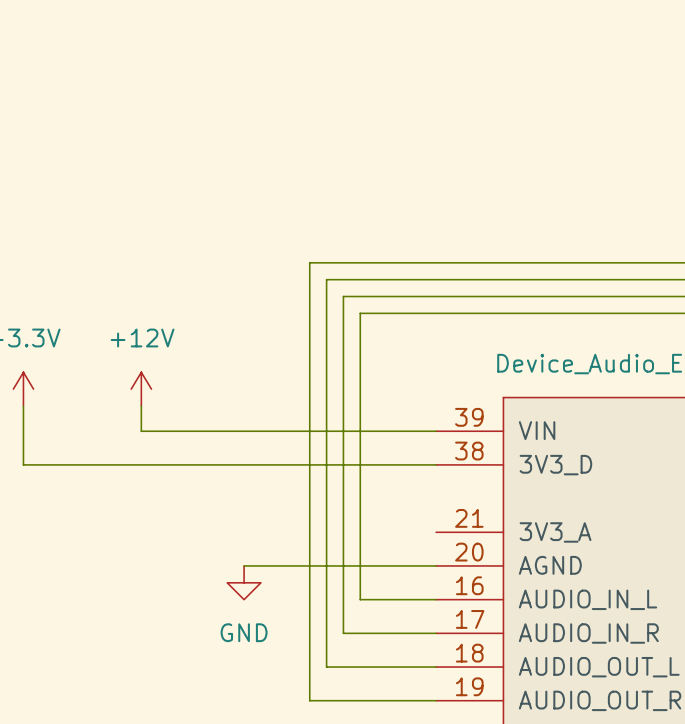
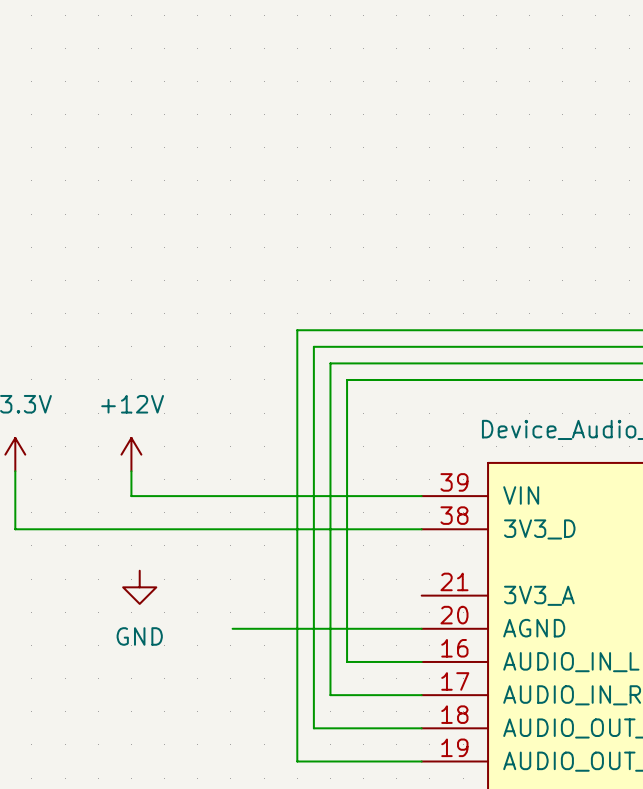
power symbol position: GND (244, 582) -> GND (139, 587)

